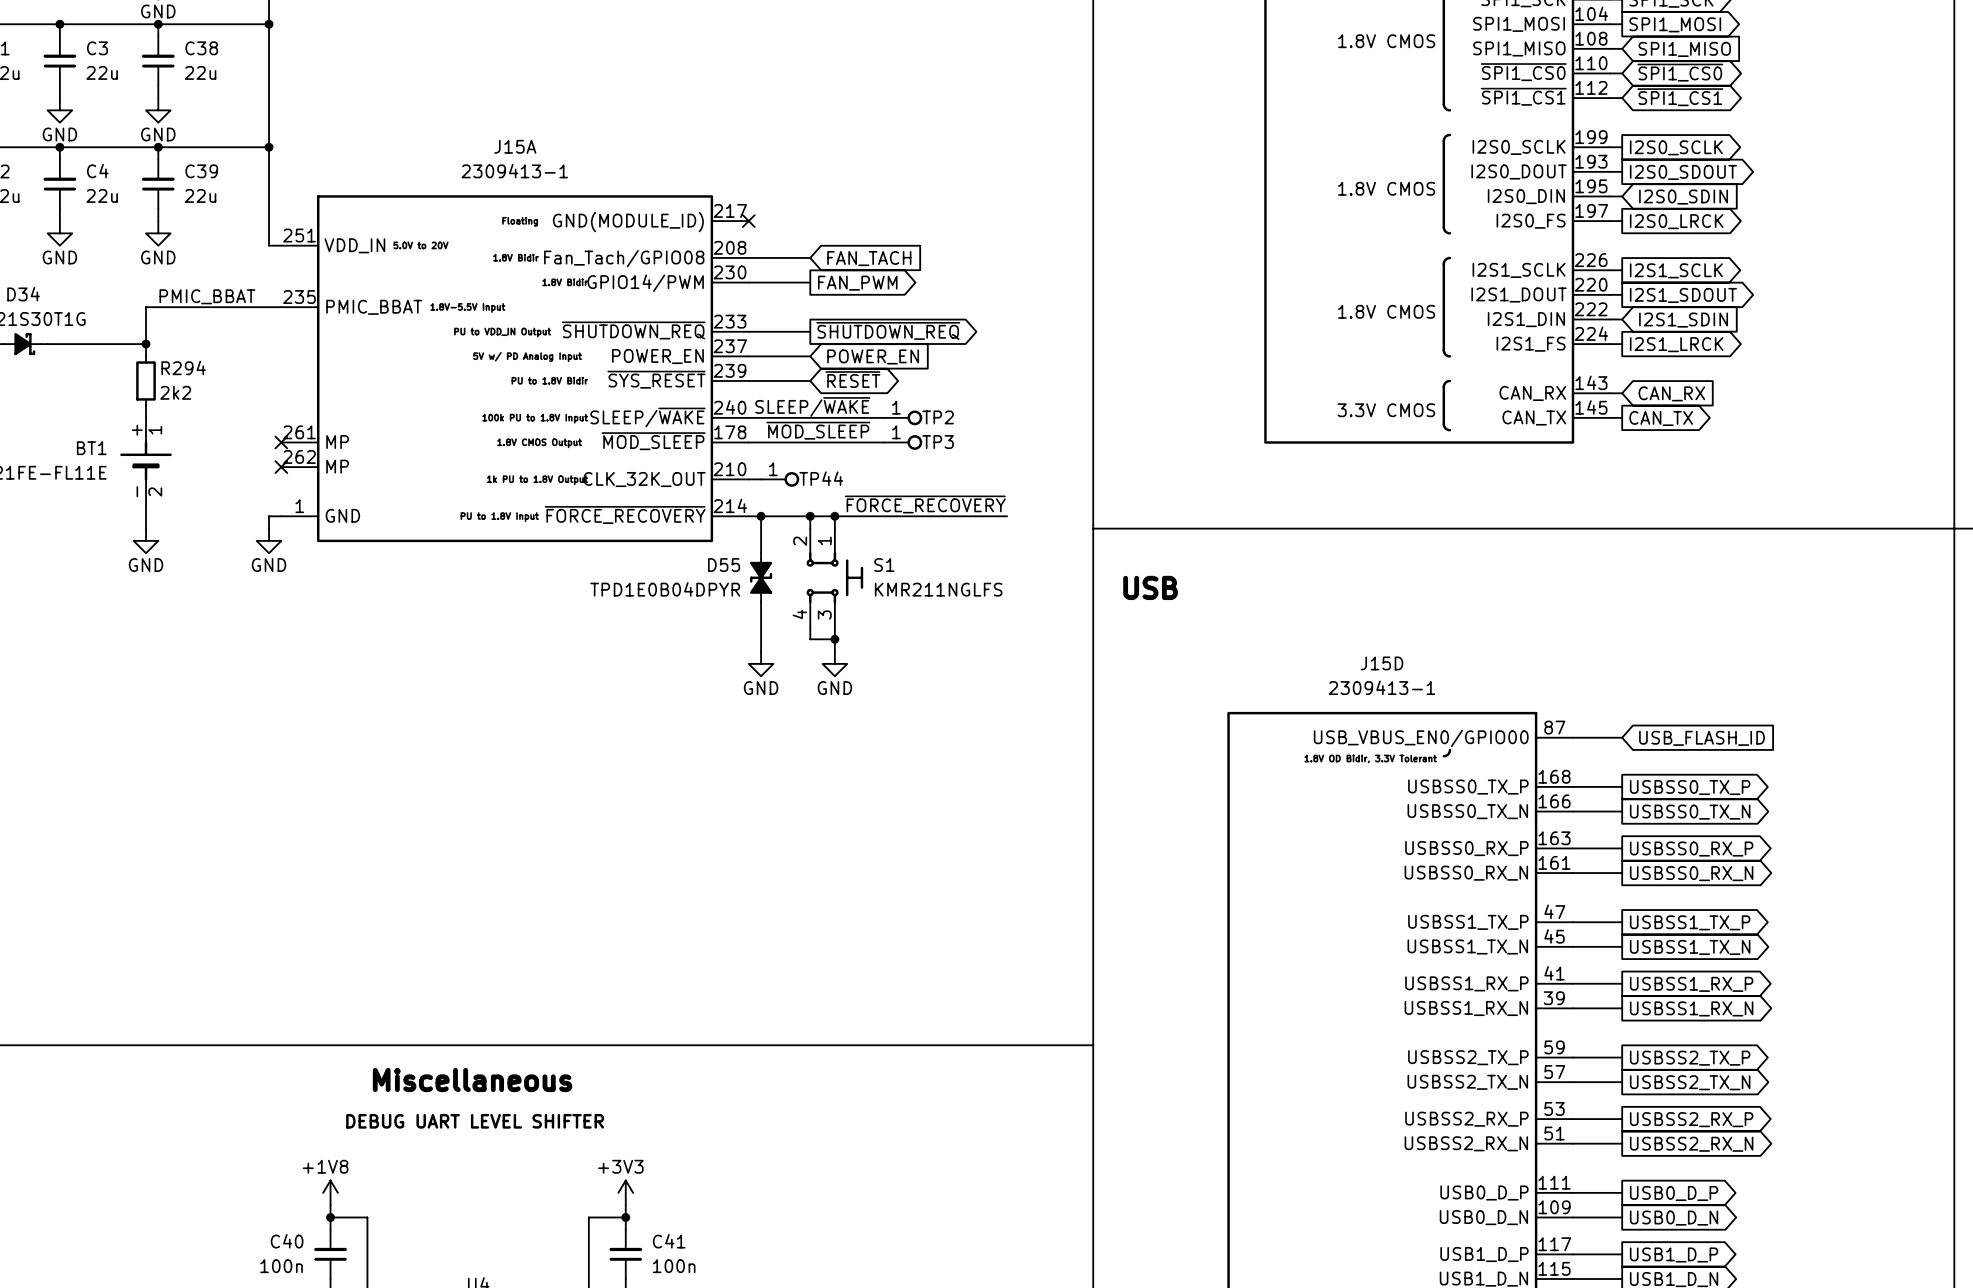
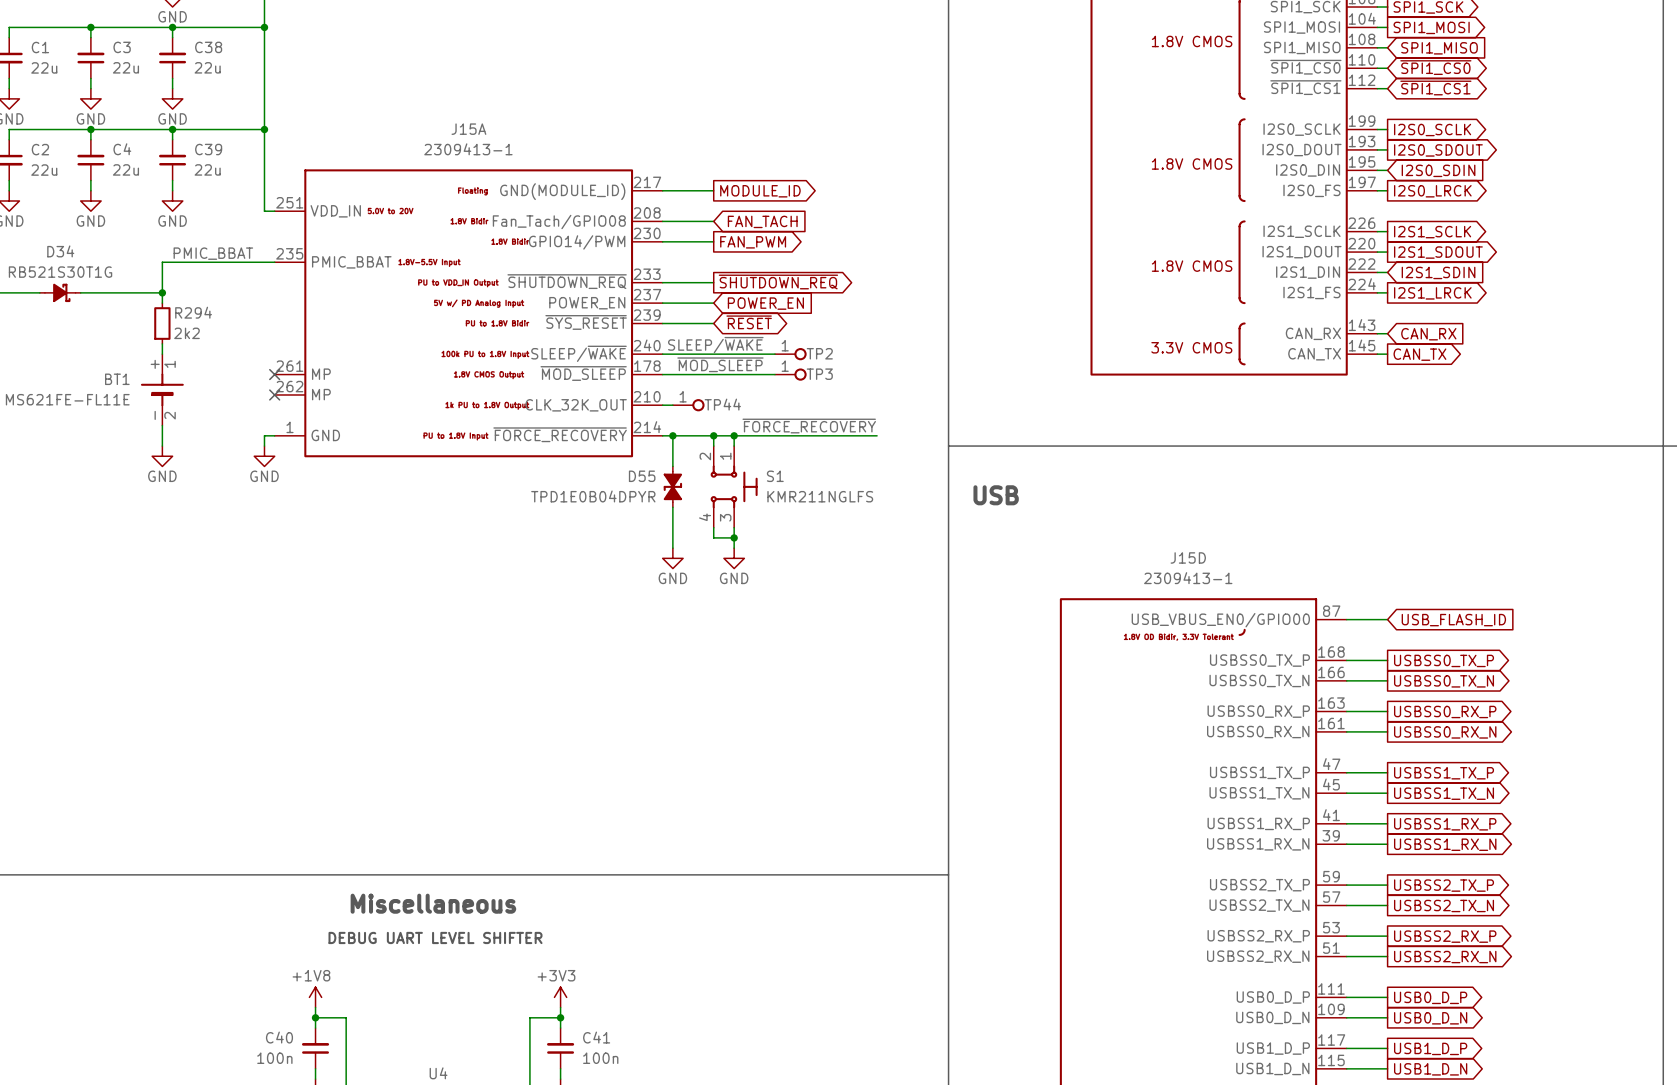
wire: none -> (662, 190) (713, 190)
no-connect mark: (748, 221) -> none
global label: none -> MODULE_ID (760, 191)

